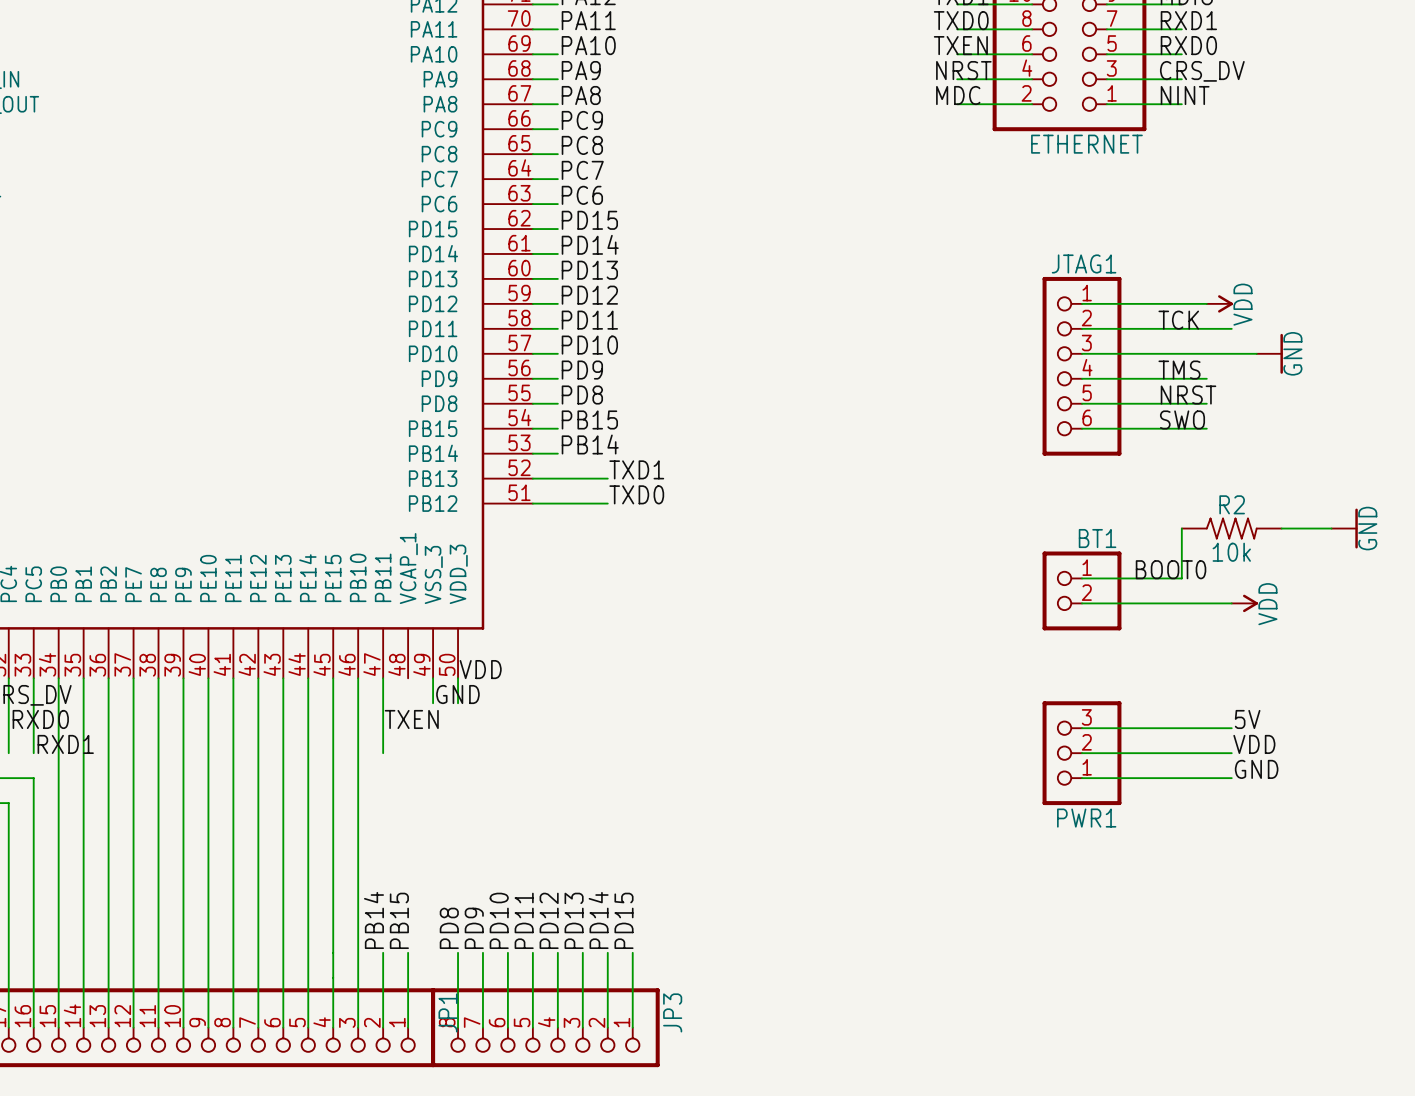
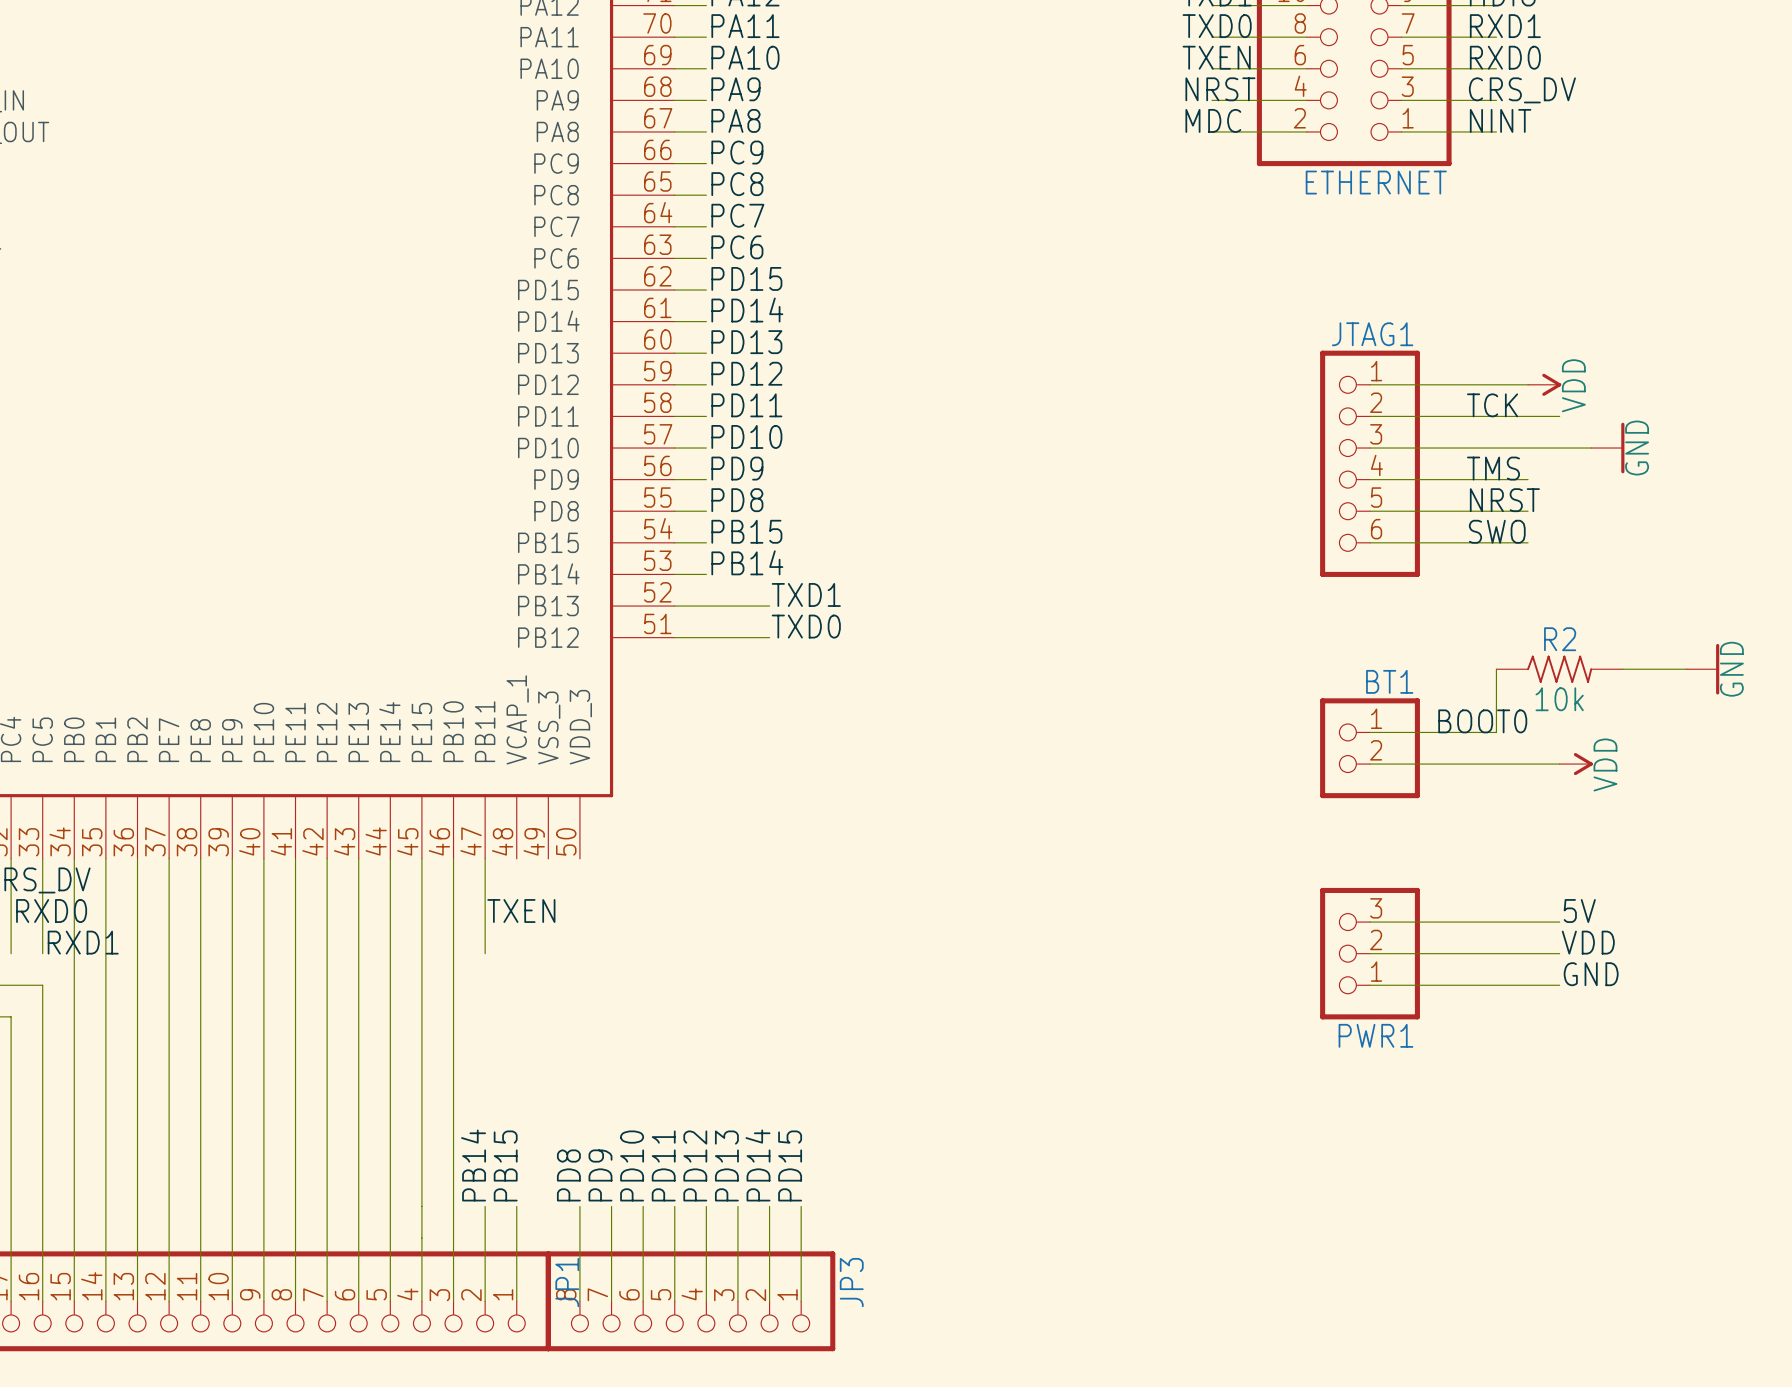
label: VDD (480, 669) -> none
wire: (433, 678) (433, 703) -> none
wire: (458, 678) (458, 703) -> none
label: GND (457, 694) -> none

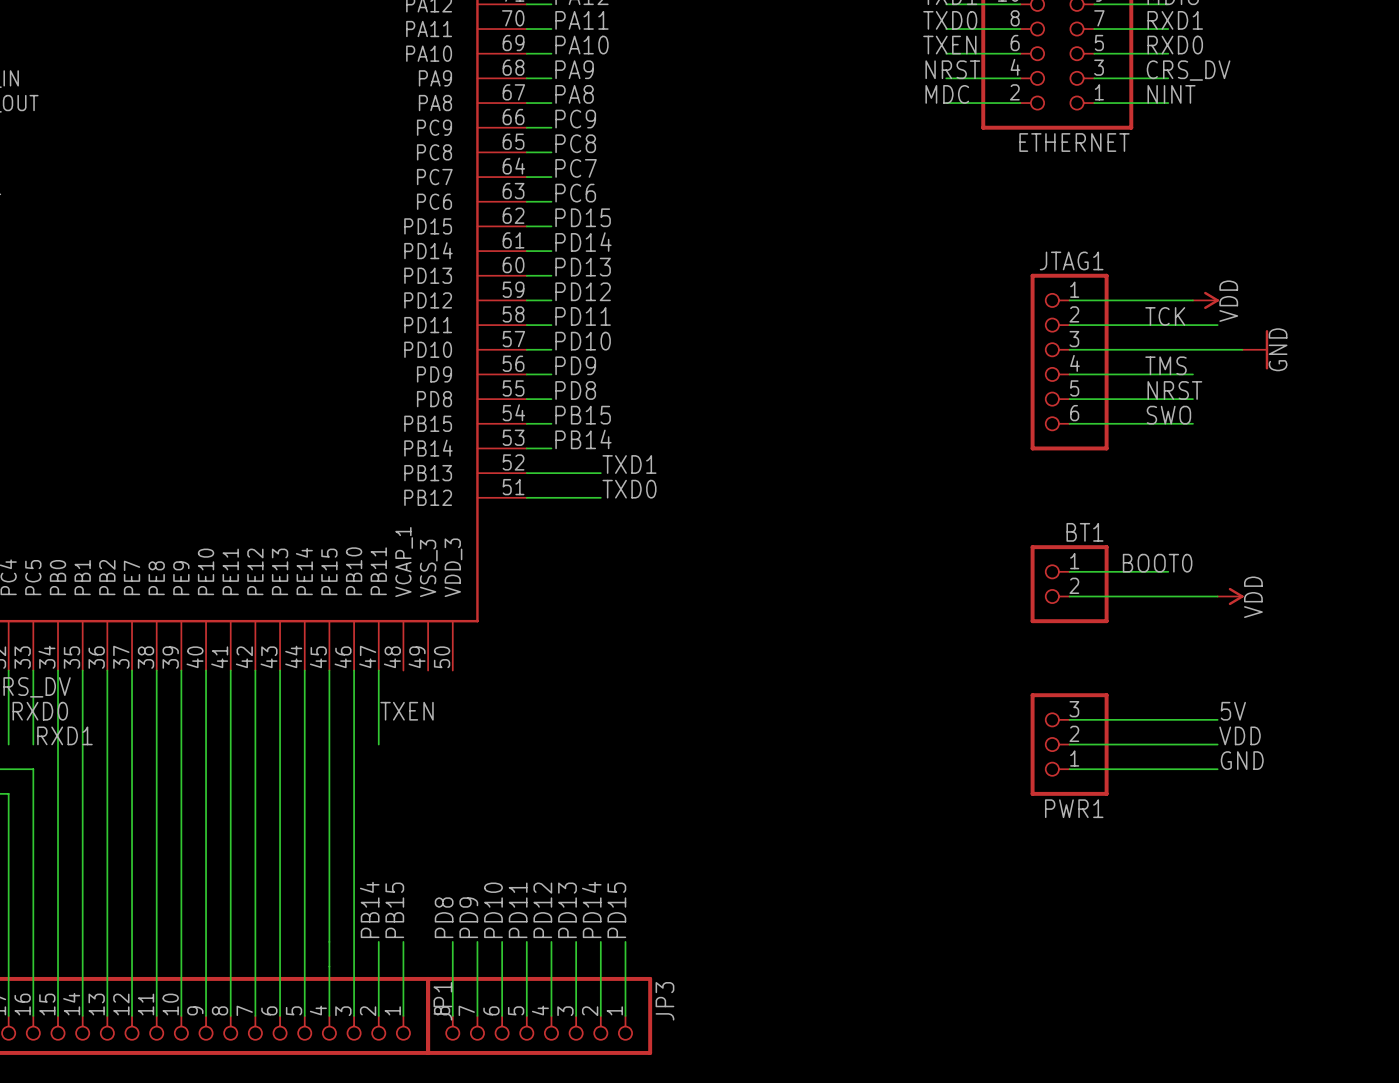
wire: (1496, 669) (1496, 732) -> none
R2: 10k (1559, 669) -> none
wire: (1622, 669) (1686, 669) -> none
power symbol: GND (1702, 669) -> none

